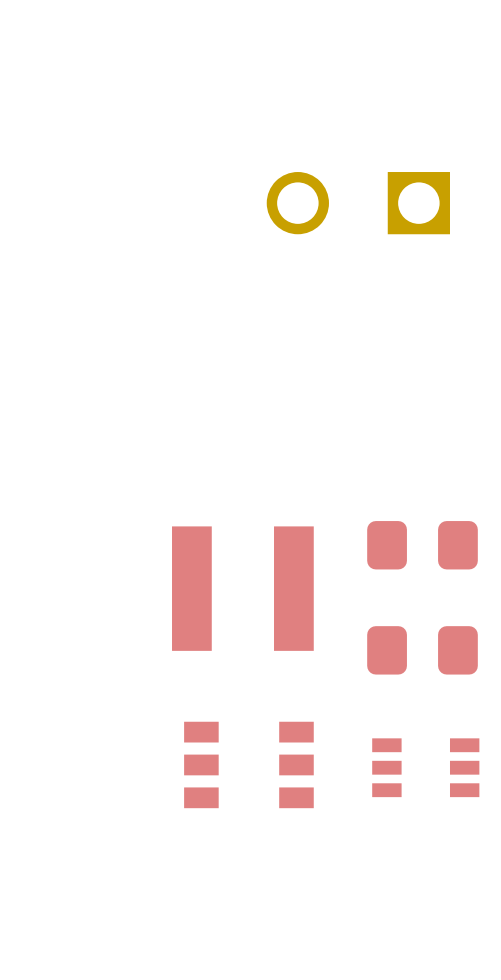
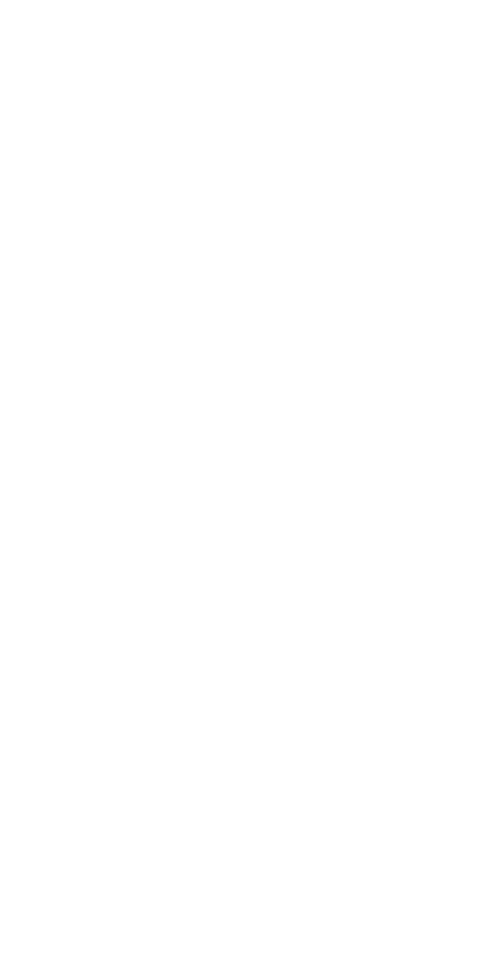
part: (358, 203) -> none
part: (422, 545) -> none
part: (242, 588) -> none
part: (422, 650) -> none
part: (248, 764) -> none
part: (425, 767) -> none

